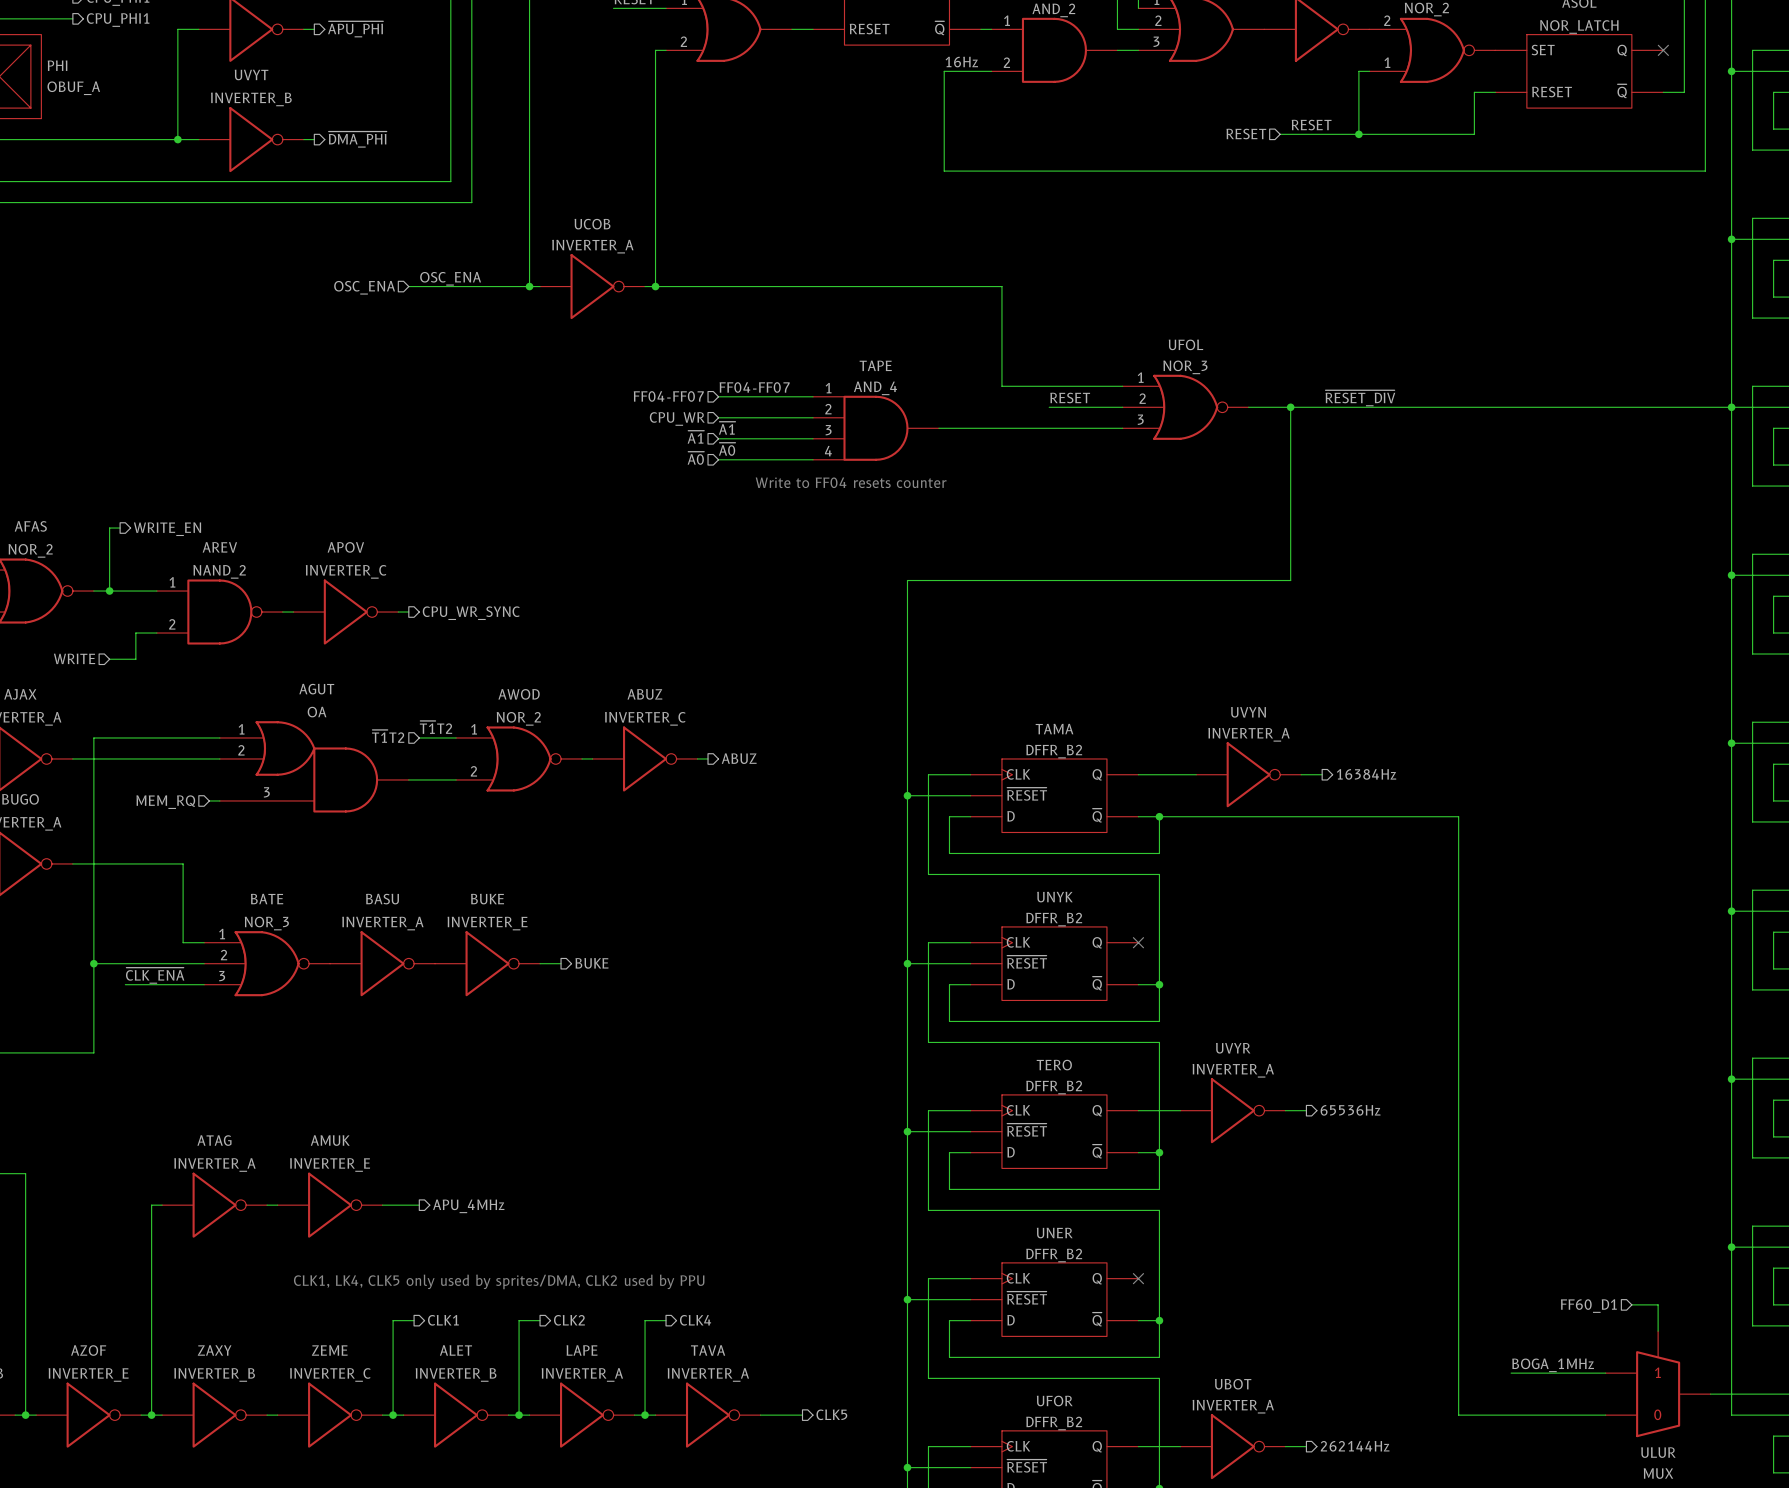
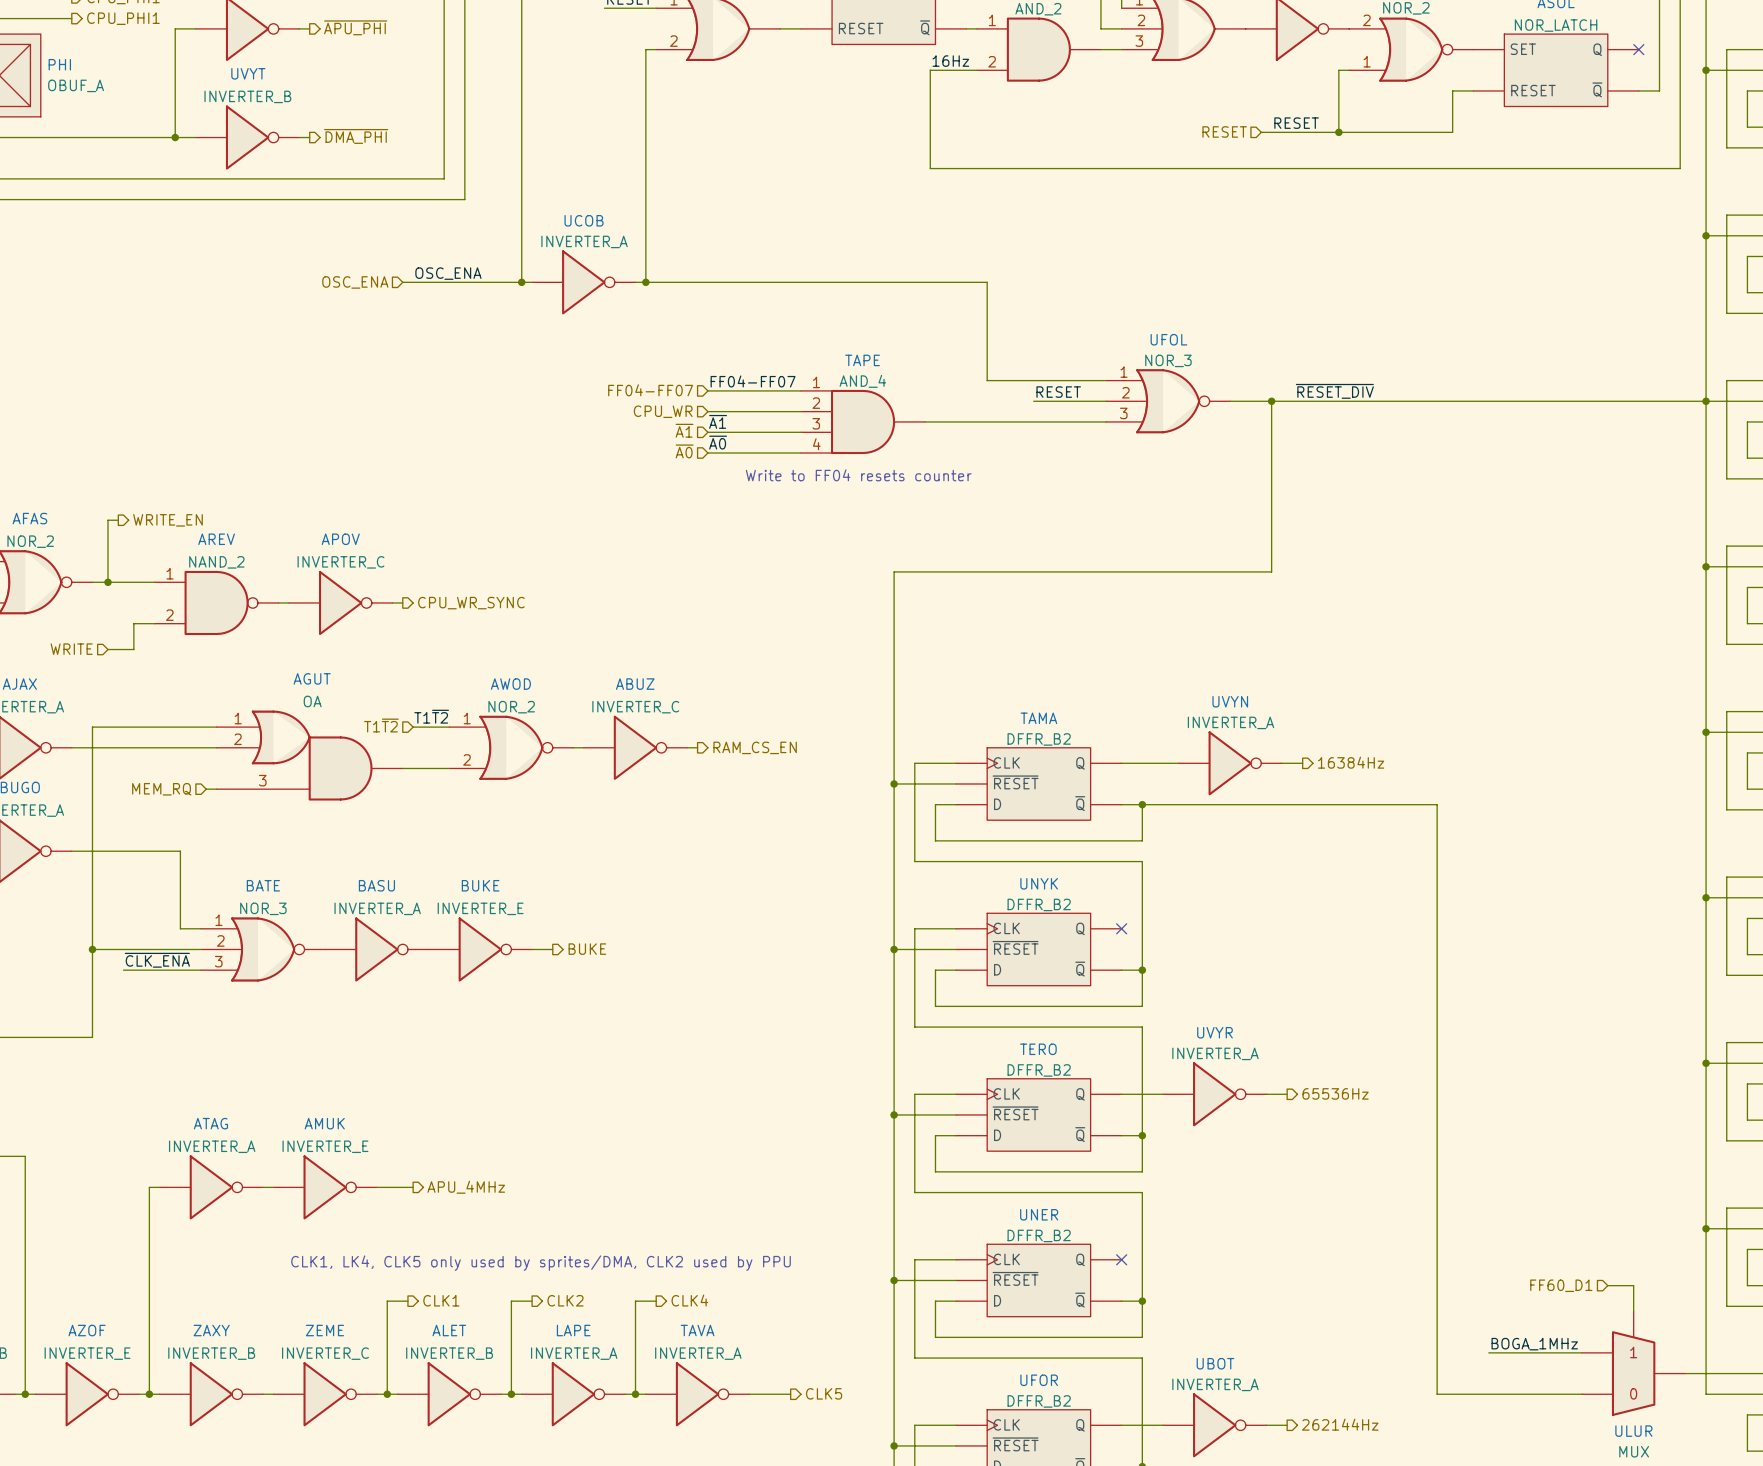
label: ~{T1}T2 (436, 727) -> T1~{T2} (431, 716)
hierarchical label: ~{T1}T2 (388, 736) -> T1~{T2} (381, 725)
hierarchical label: ABUZ (739, 758) -> RAM_CS_EN (755, 747)

